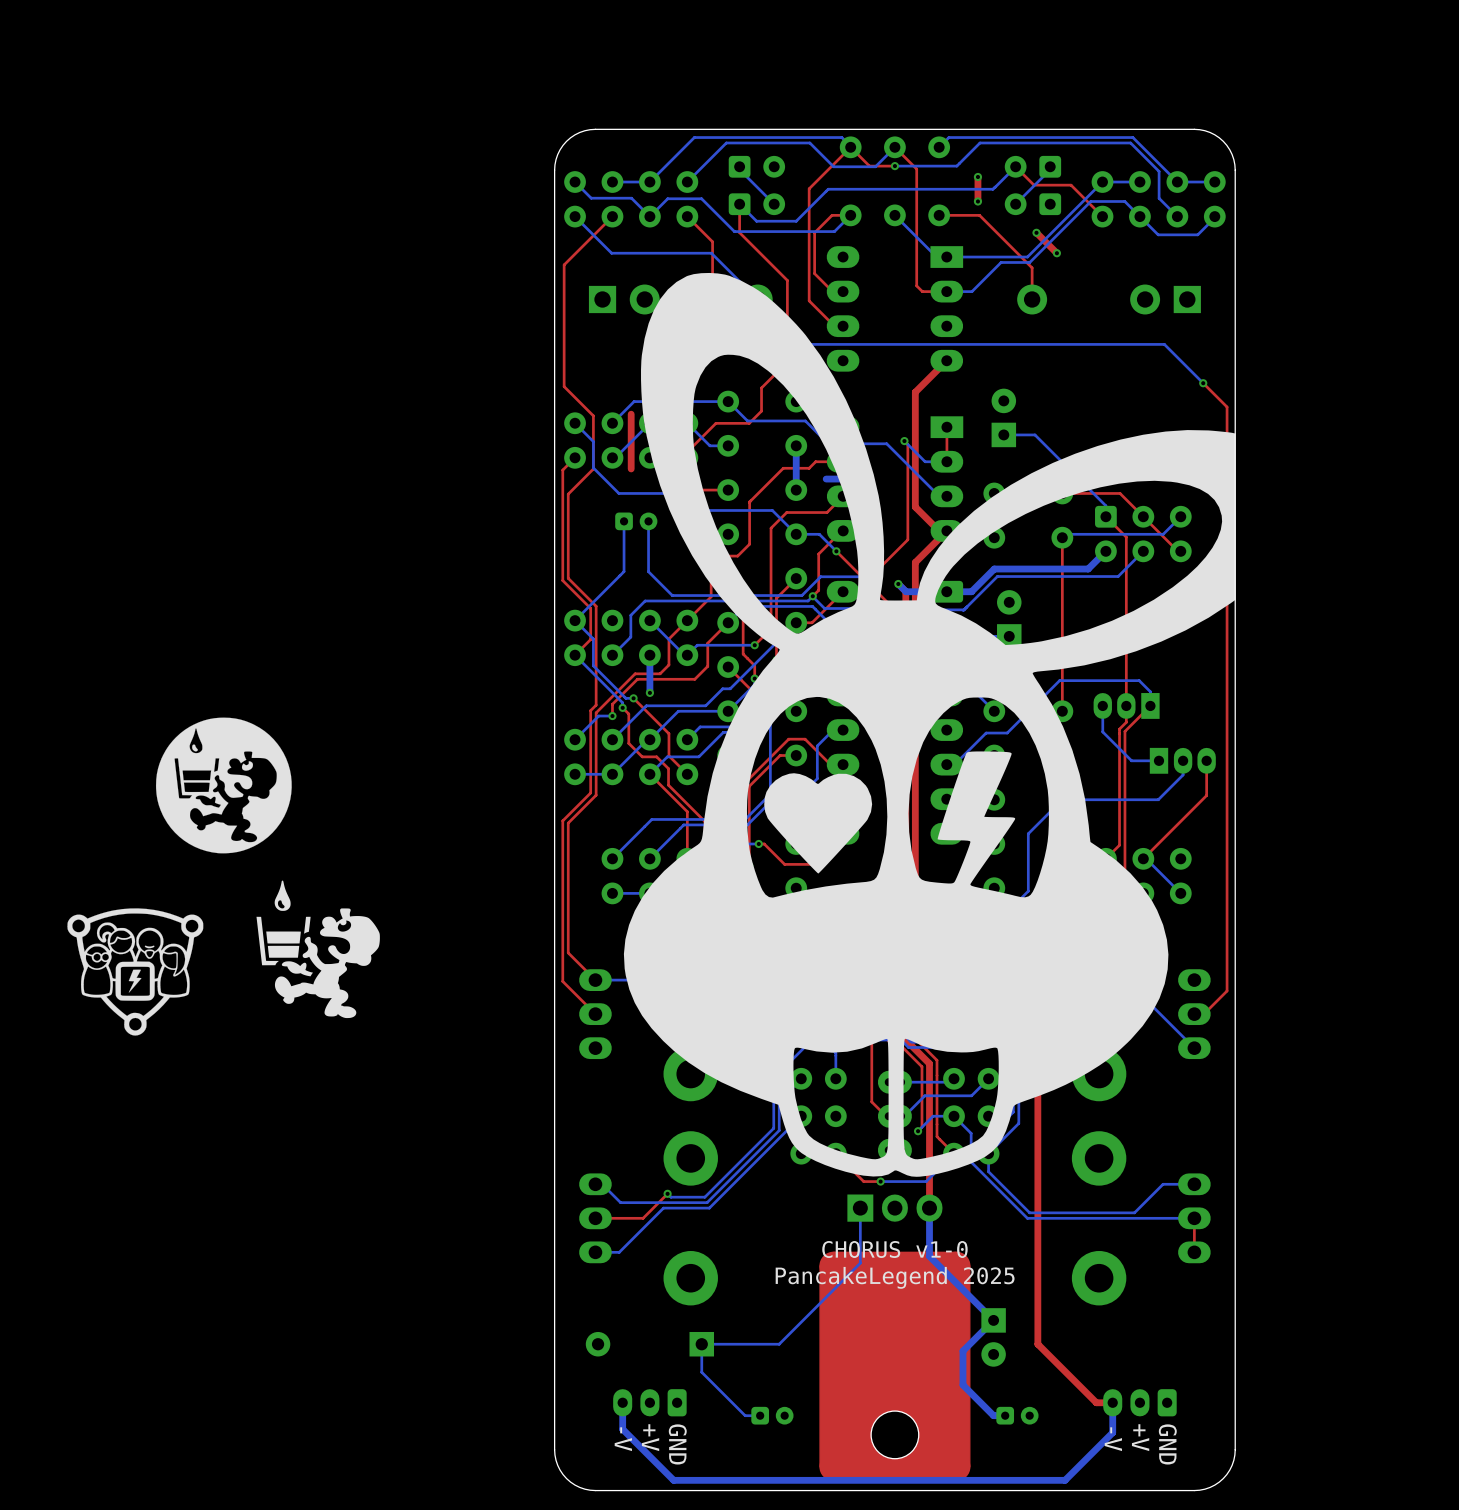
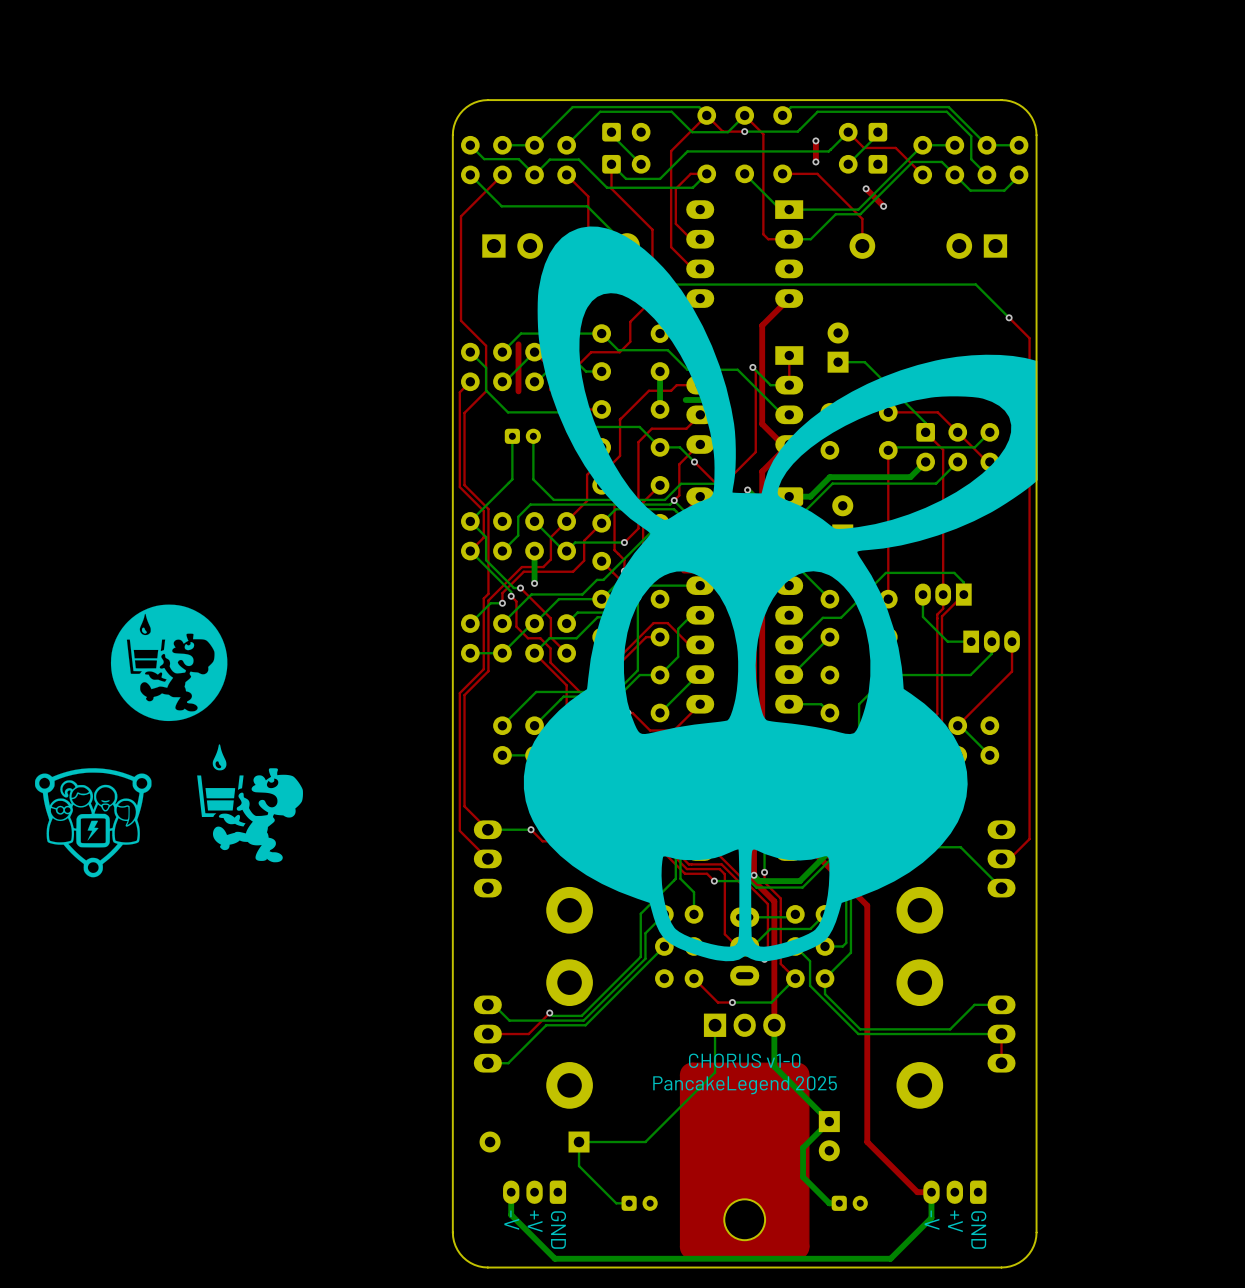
drawing: [623, 272, 1236, 1177] -> none
part: none -> (780, 593)

